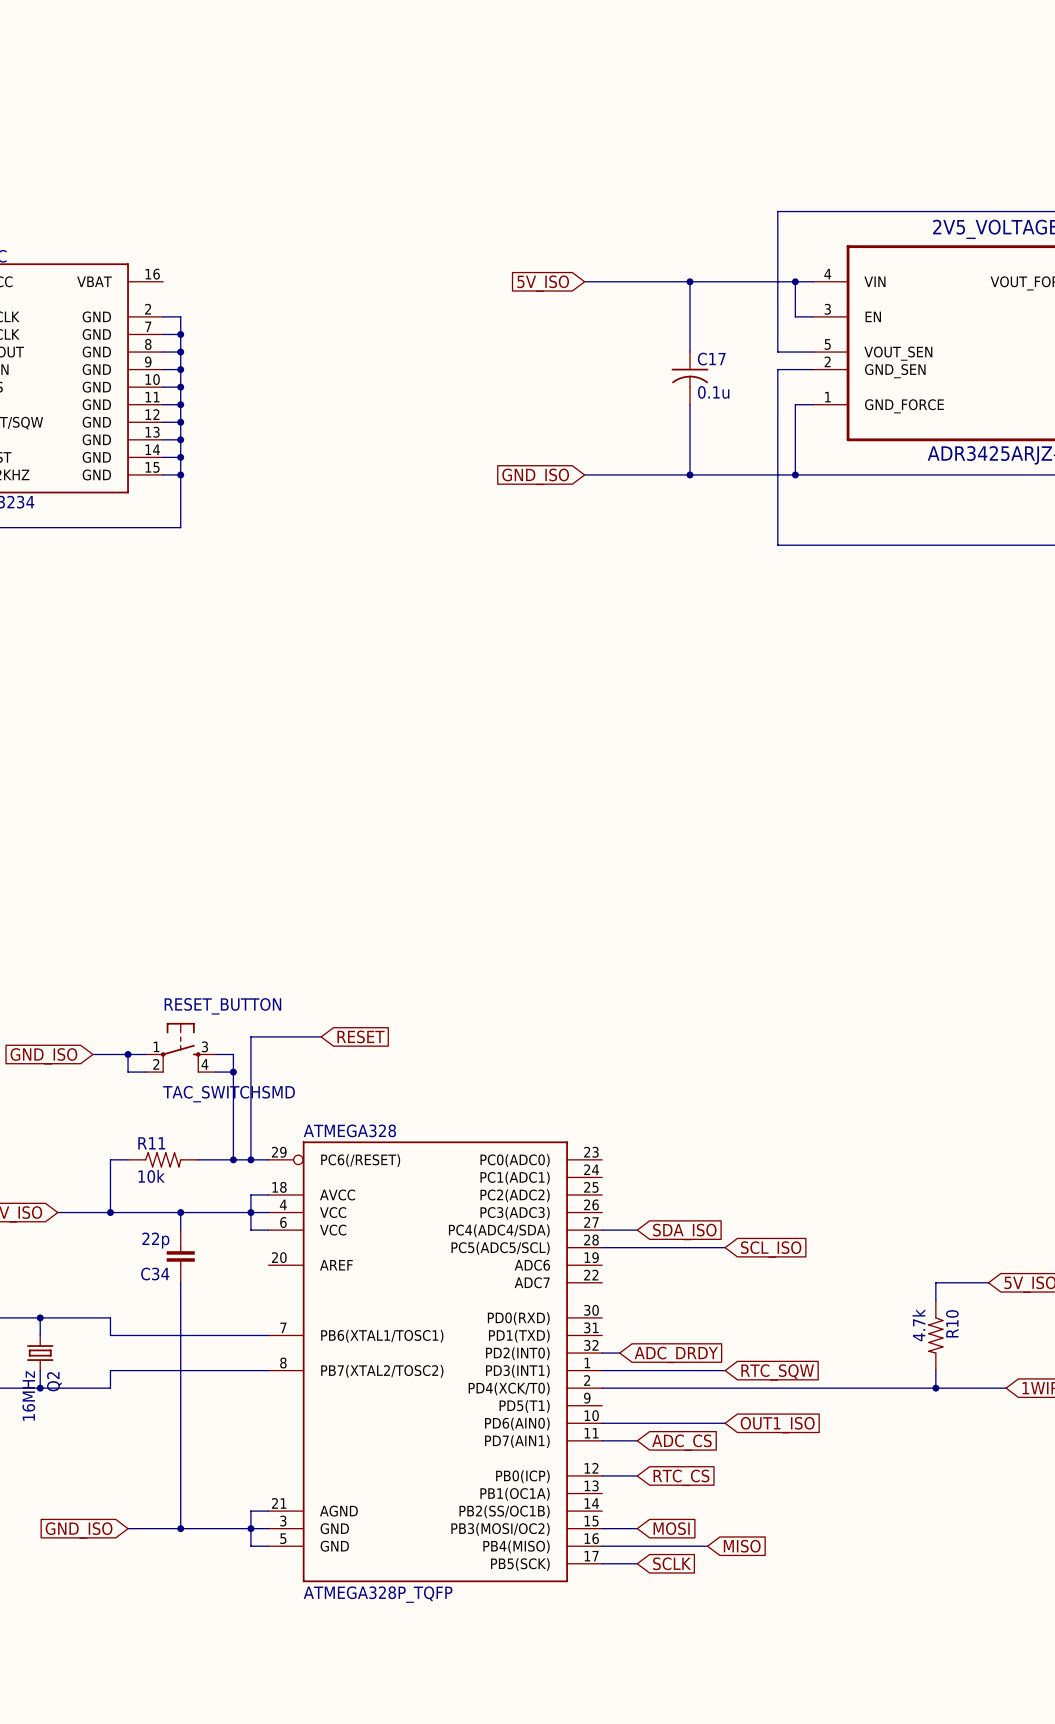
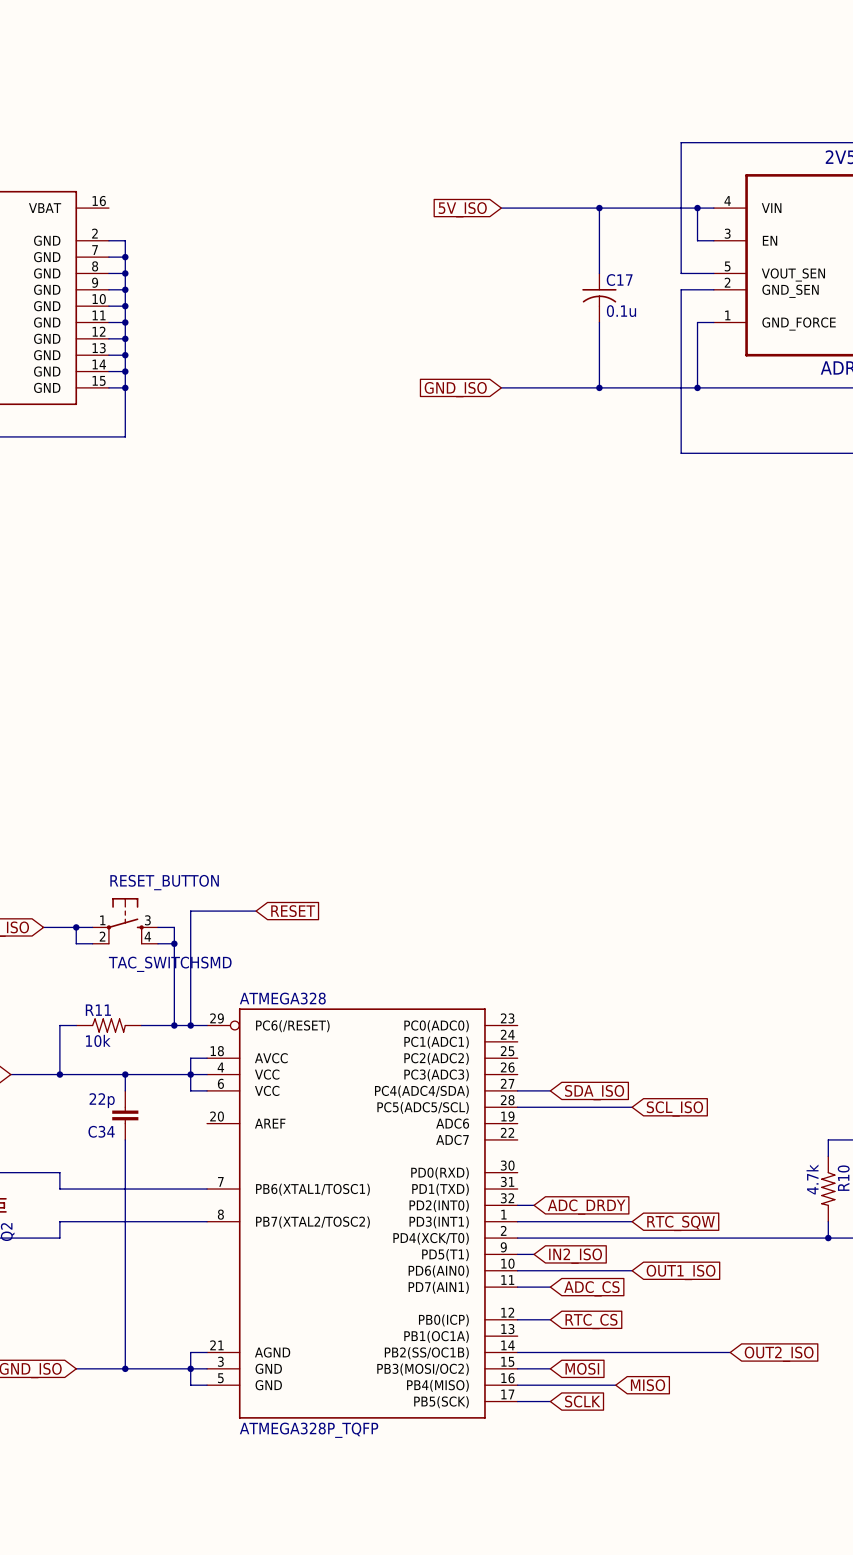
wire: none -> (517, 1254) (534, 1254)
global label: none -> IN2_ISO (575, 1256)
wire: none -> (517, 1352) (730, 1352)
global label: none -> OUT2_ISO (779, 1354)

